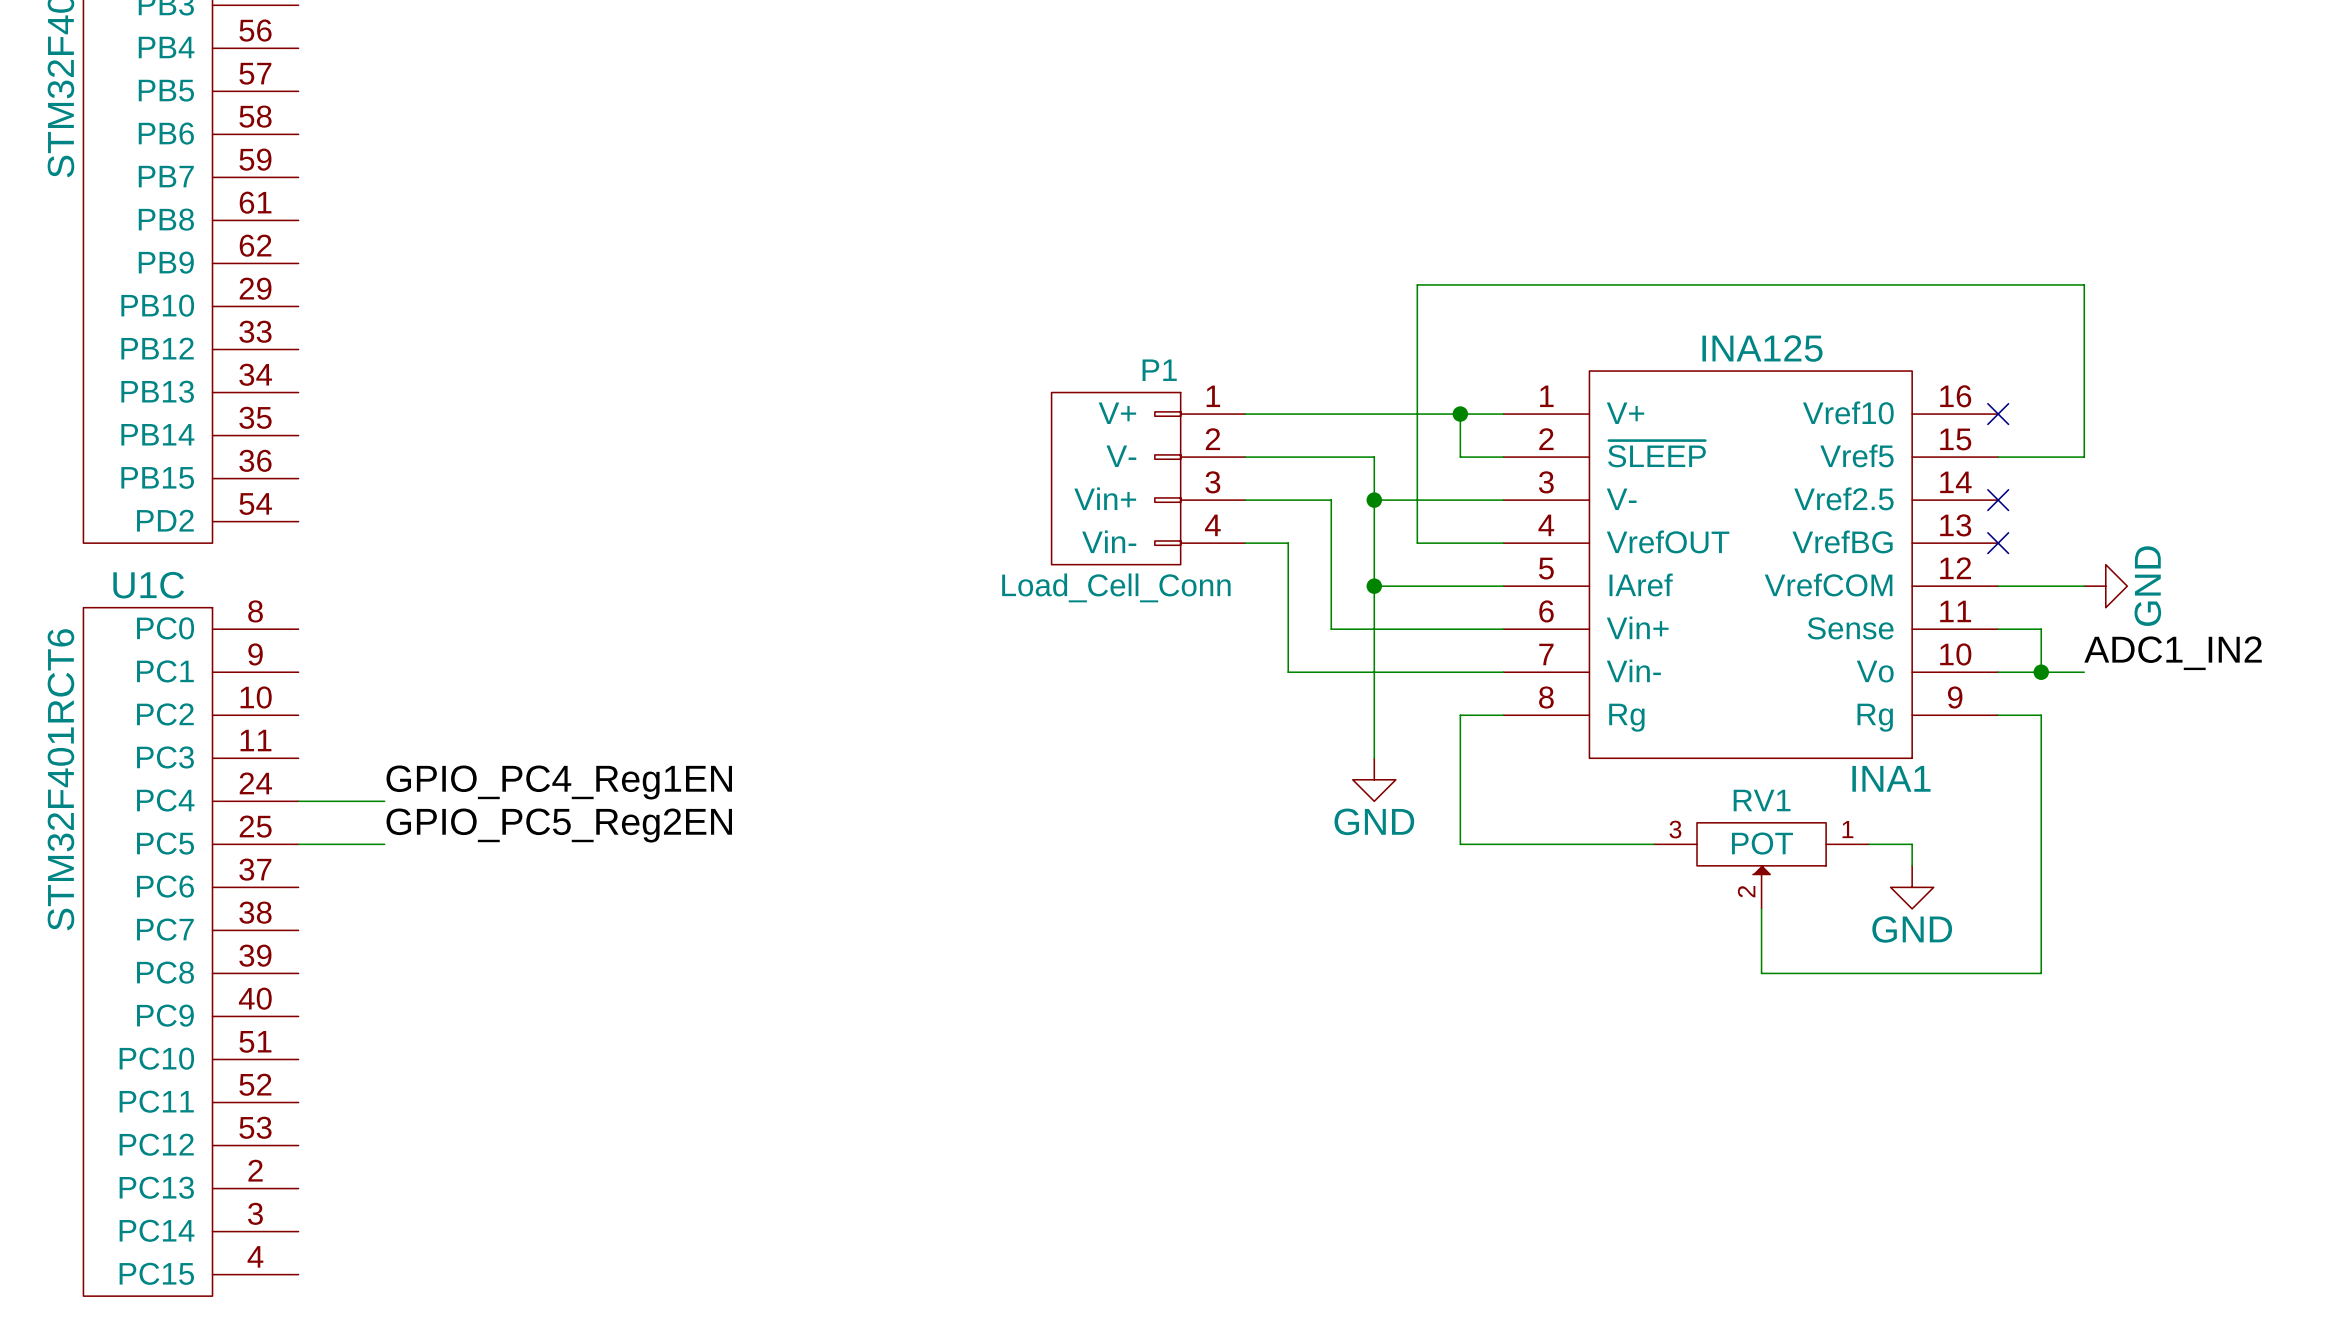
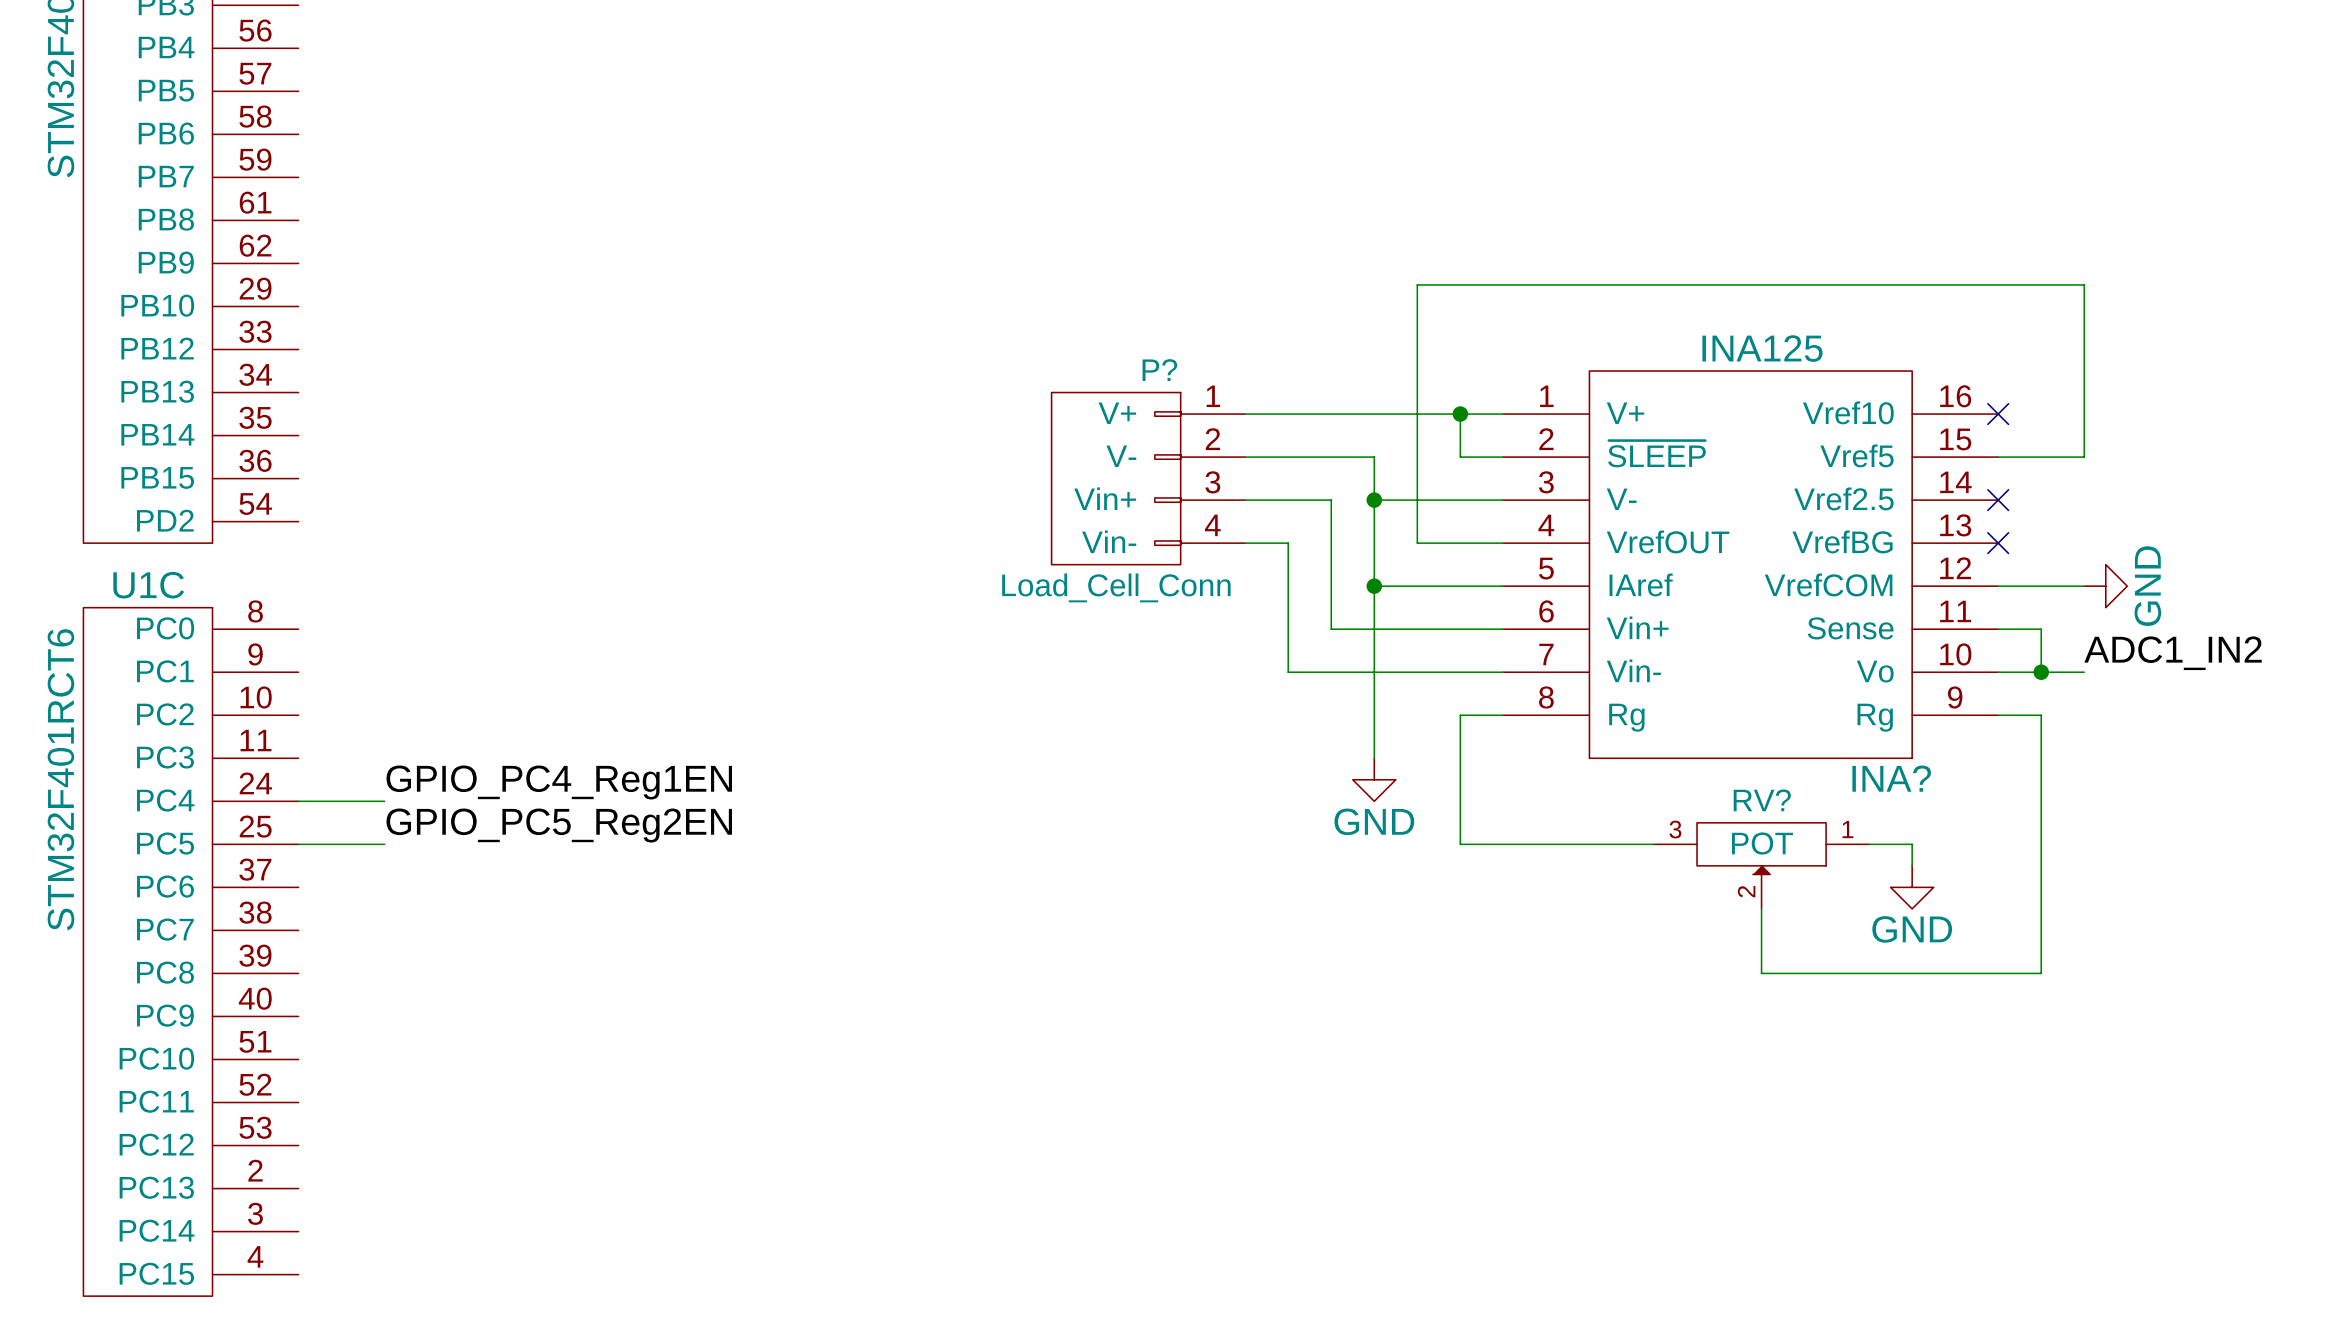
P1 name: P1 (1159, 370) -> P? (1159, 370)
INA1 name: INA1 (1891, 778) -> INA? (1891, 778)
RV1 name: RV1 (1762, 800) -> RV? (1762, 800)

